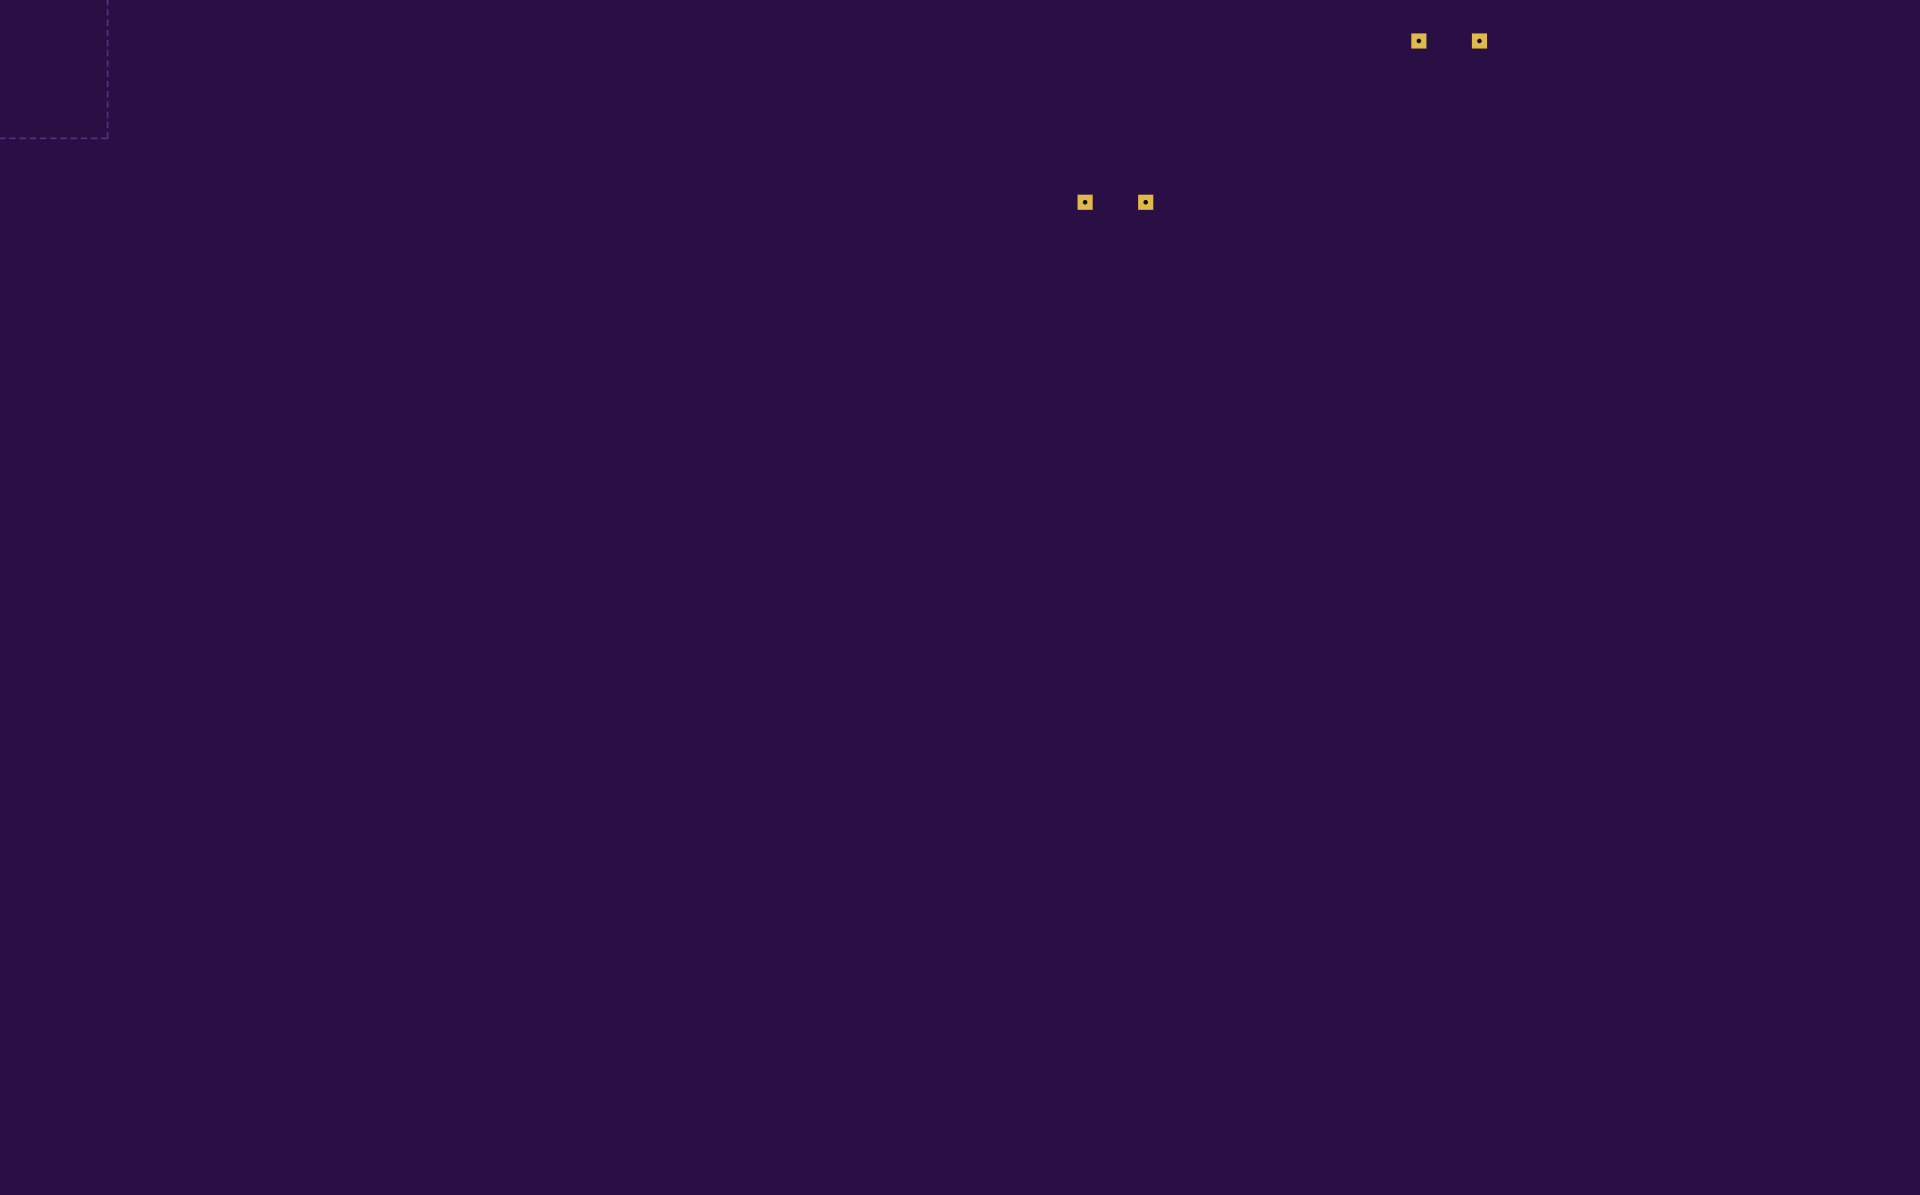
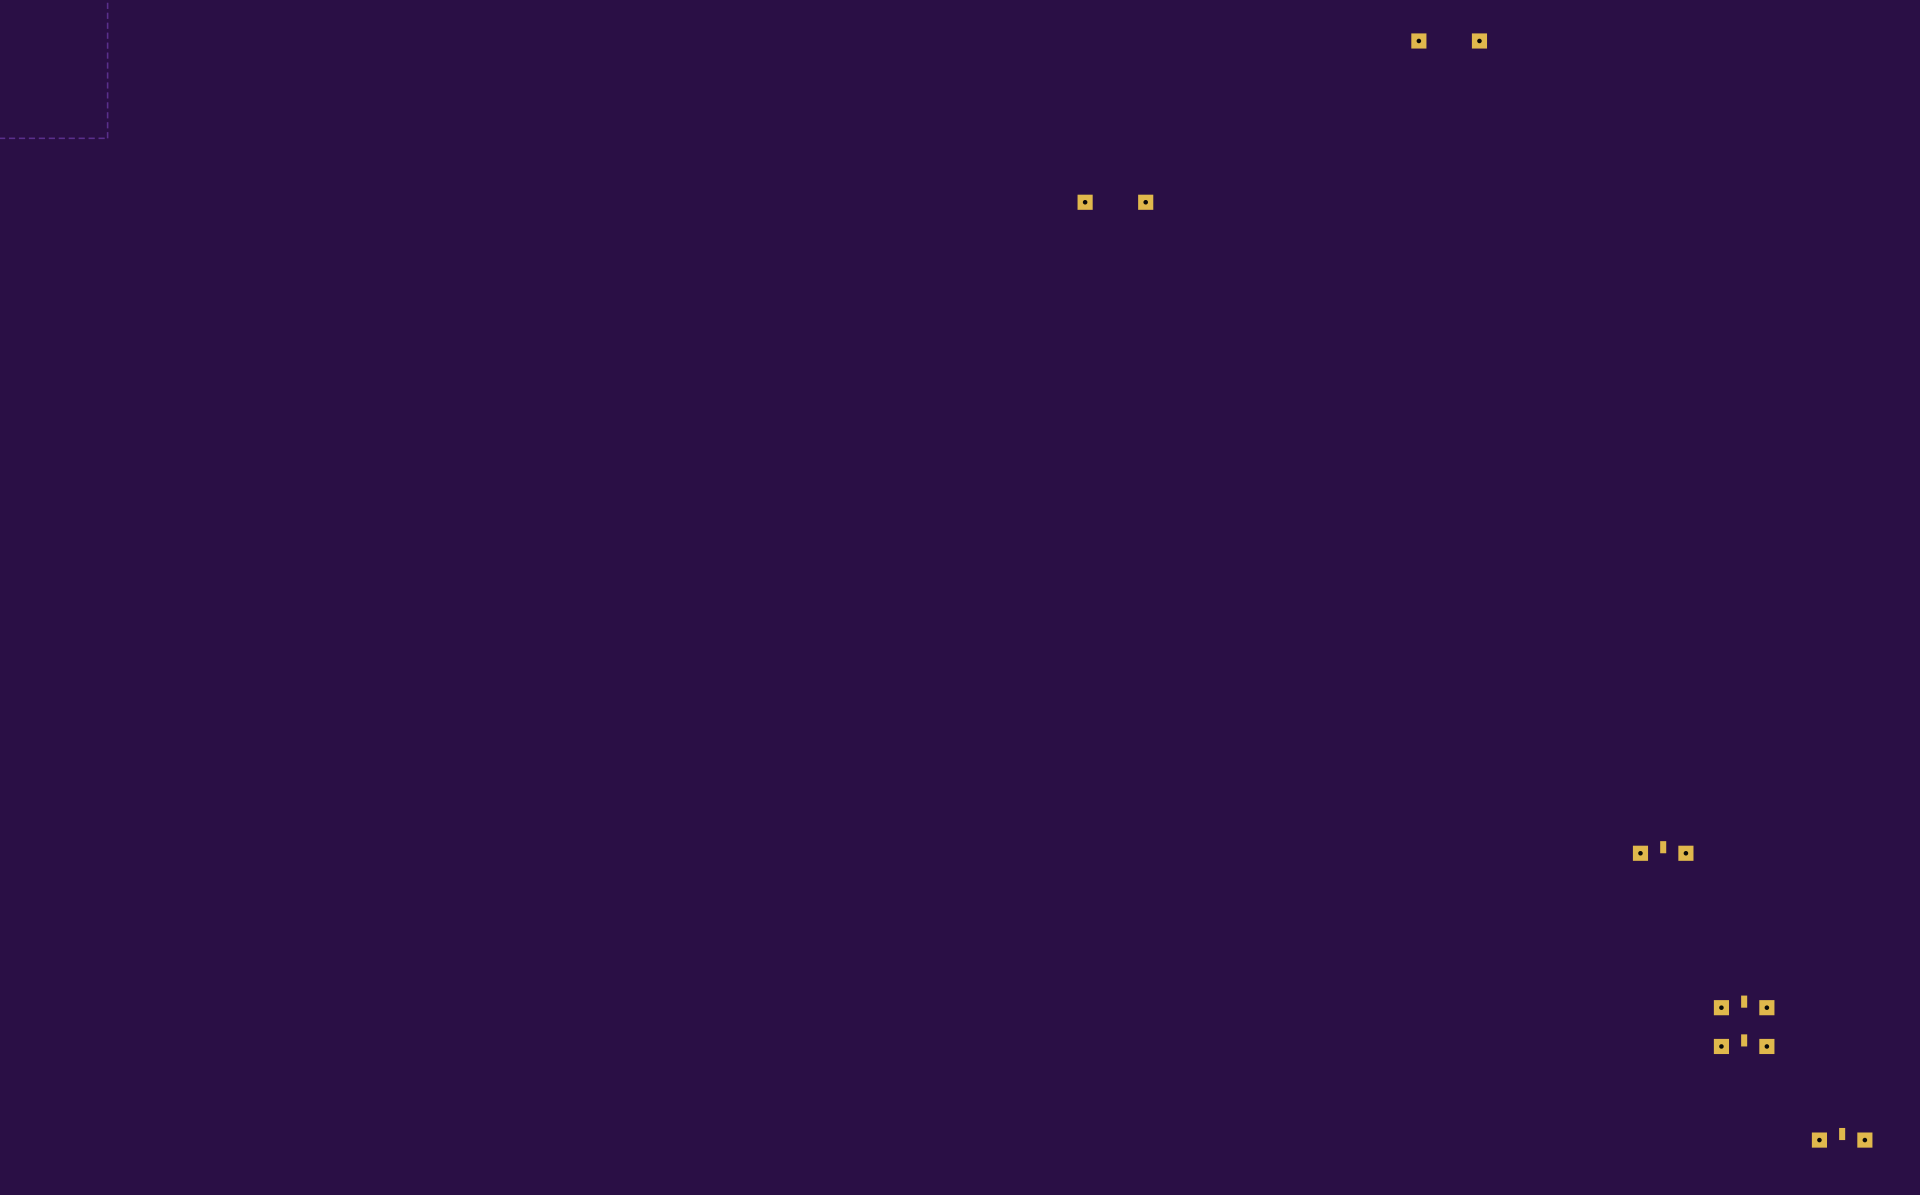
part: none -> (1663, 850)
part: none -> (1744, 1005)
part: none -> (1744, 1044)
part: none -> (1842, 1137)

